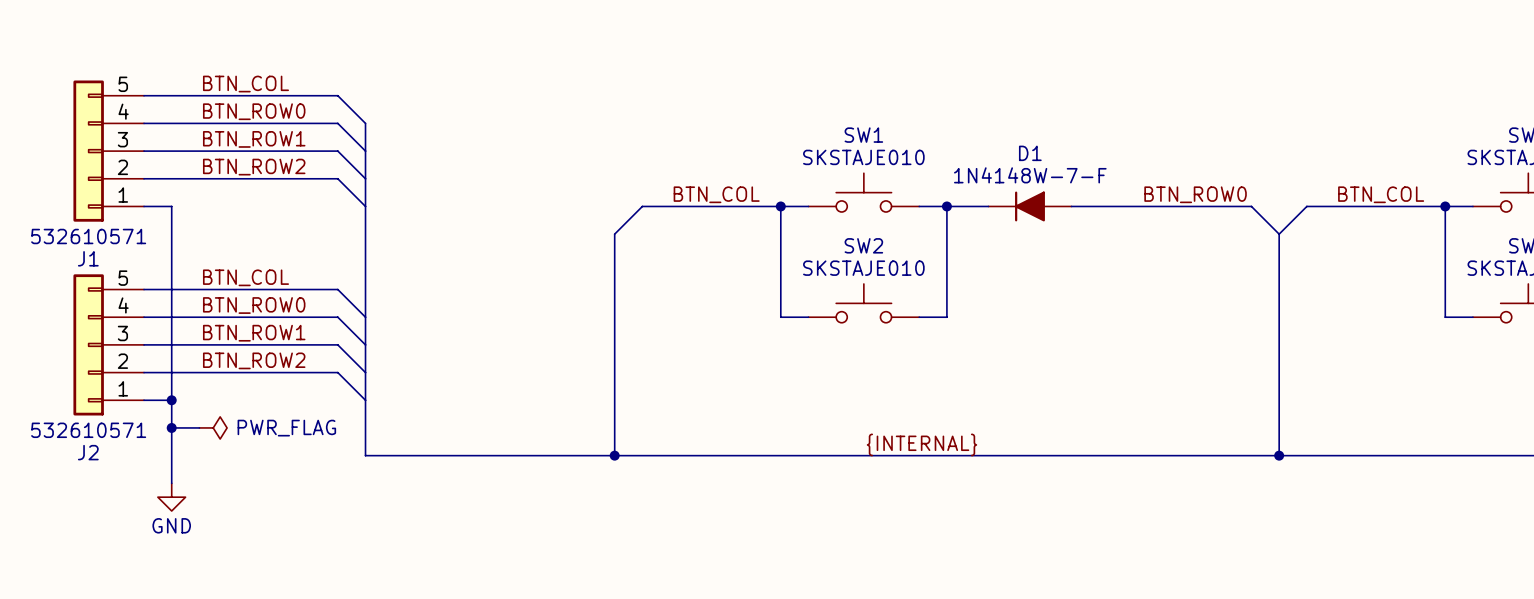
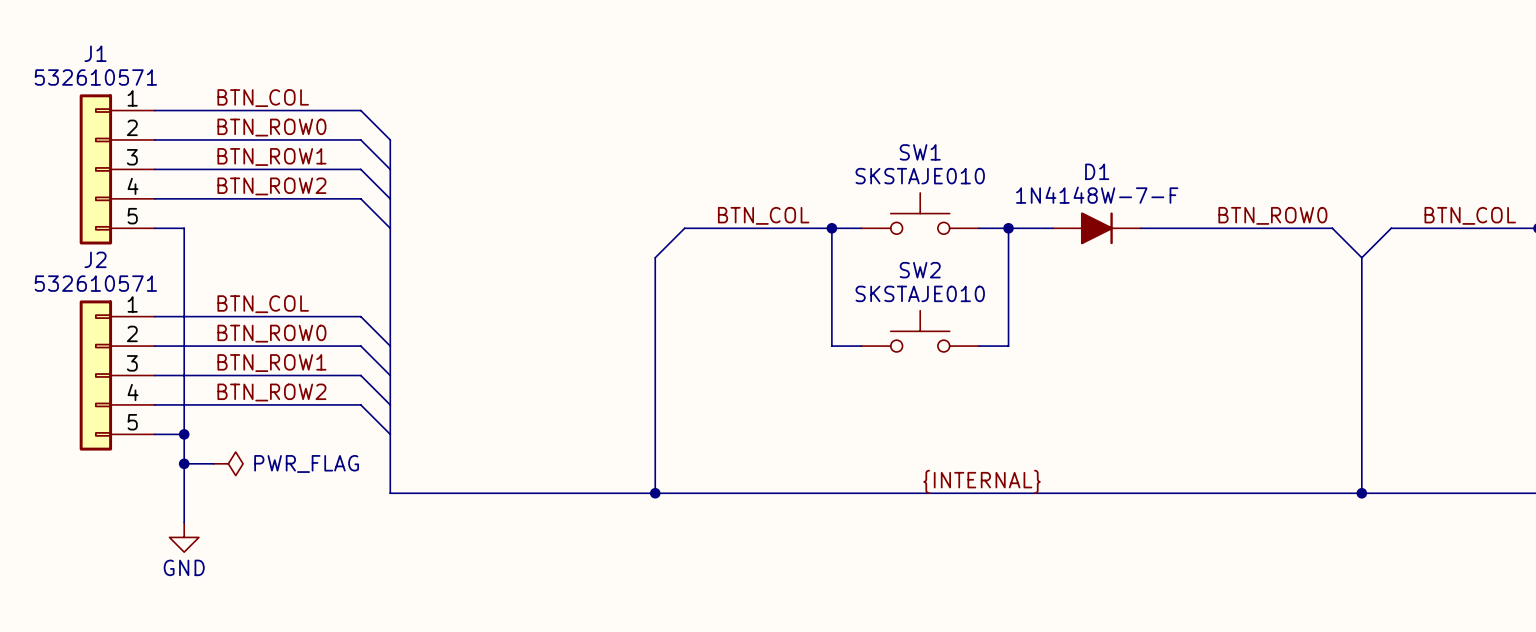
J1 flip: as is (88, 151) -> up-down (95, 169)
D1 rotation: 0° (1029, 206) -> 180° (1096, 228)
J2 flip: as is (88, 344) -> up-down (95, 375)

